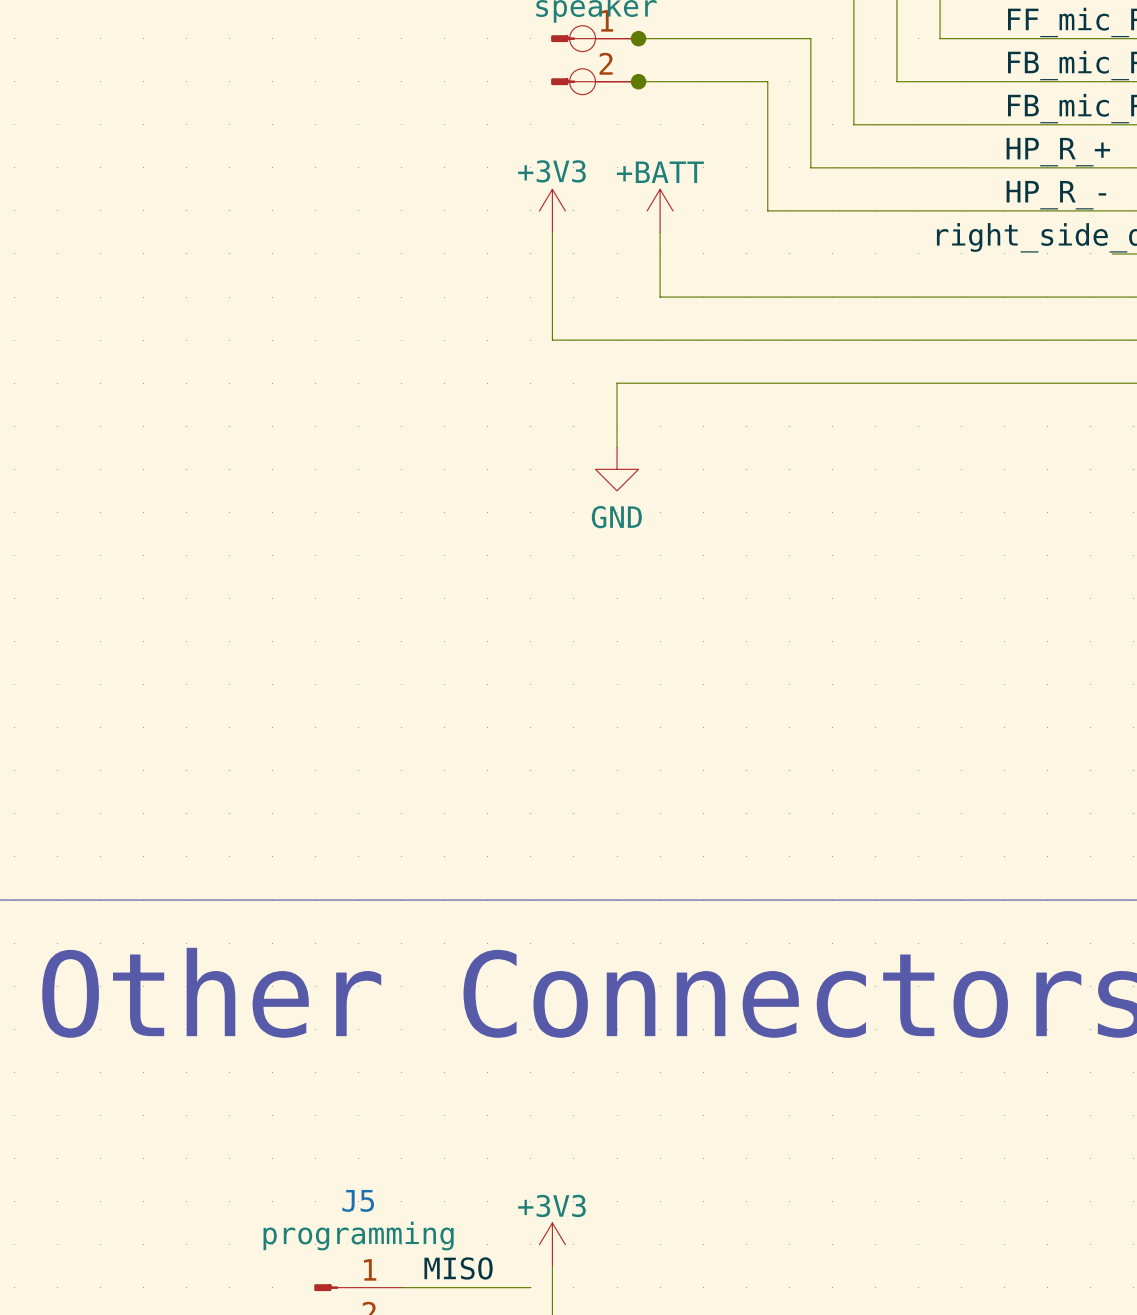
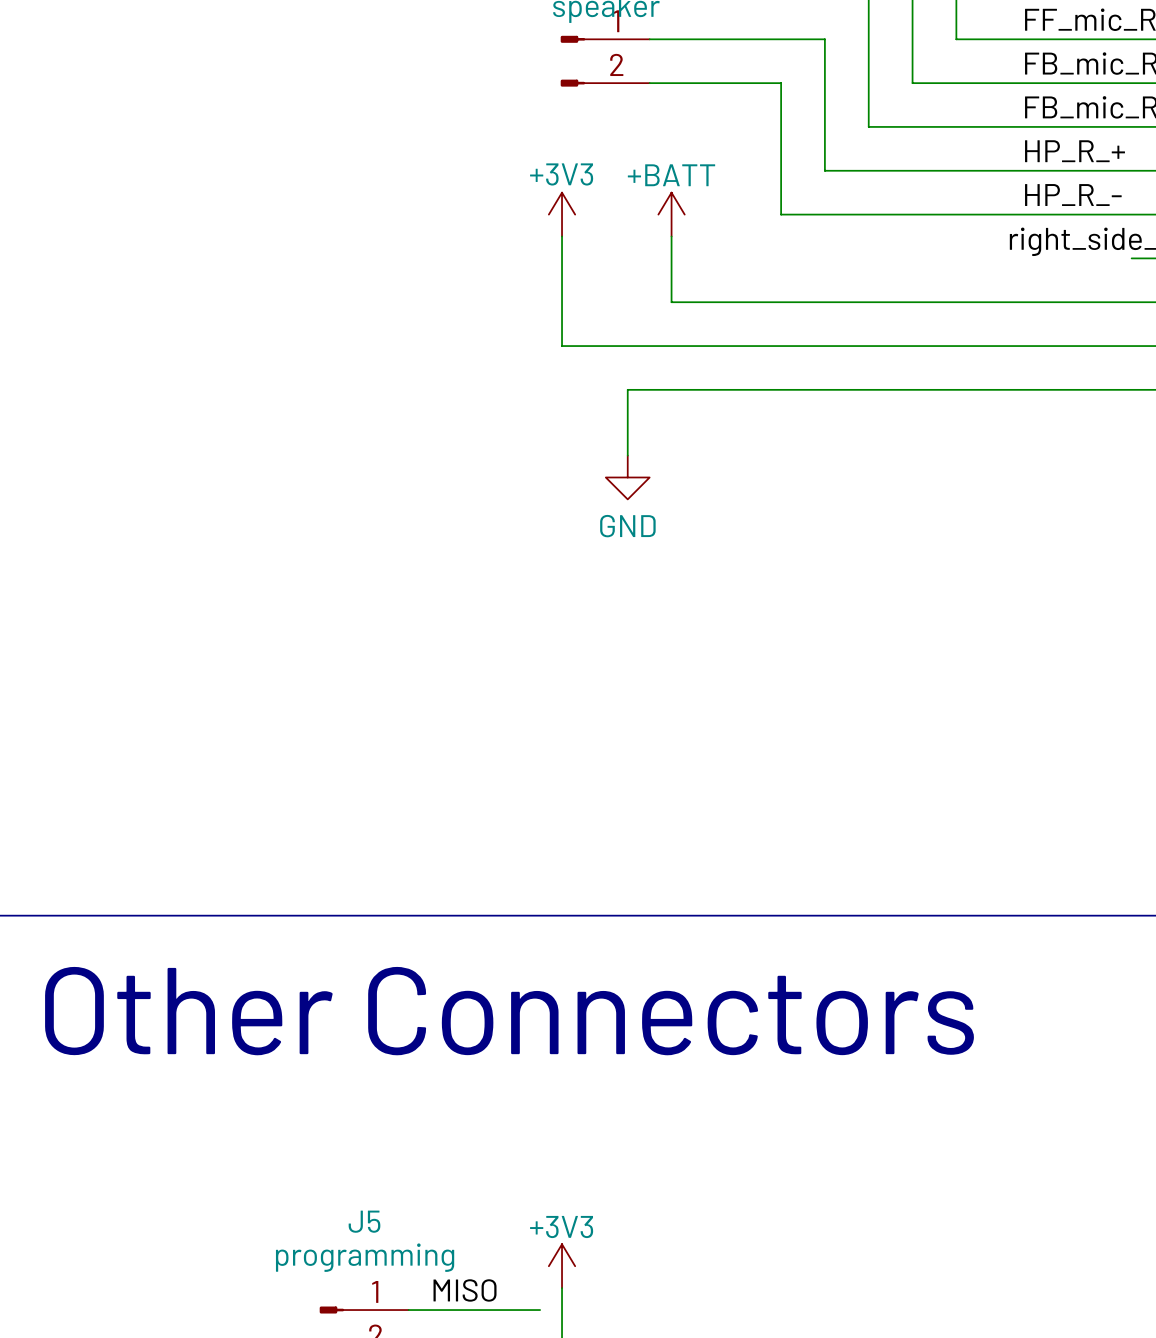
part: (604, 38) -> none
junction: (638, 38) -> none
part: (604, 81) -> none
junction: (638, 81) -> none

